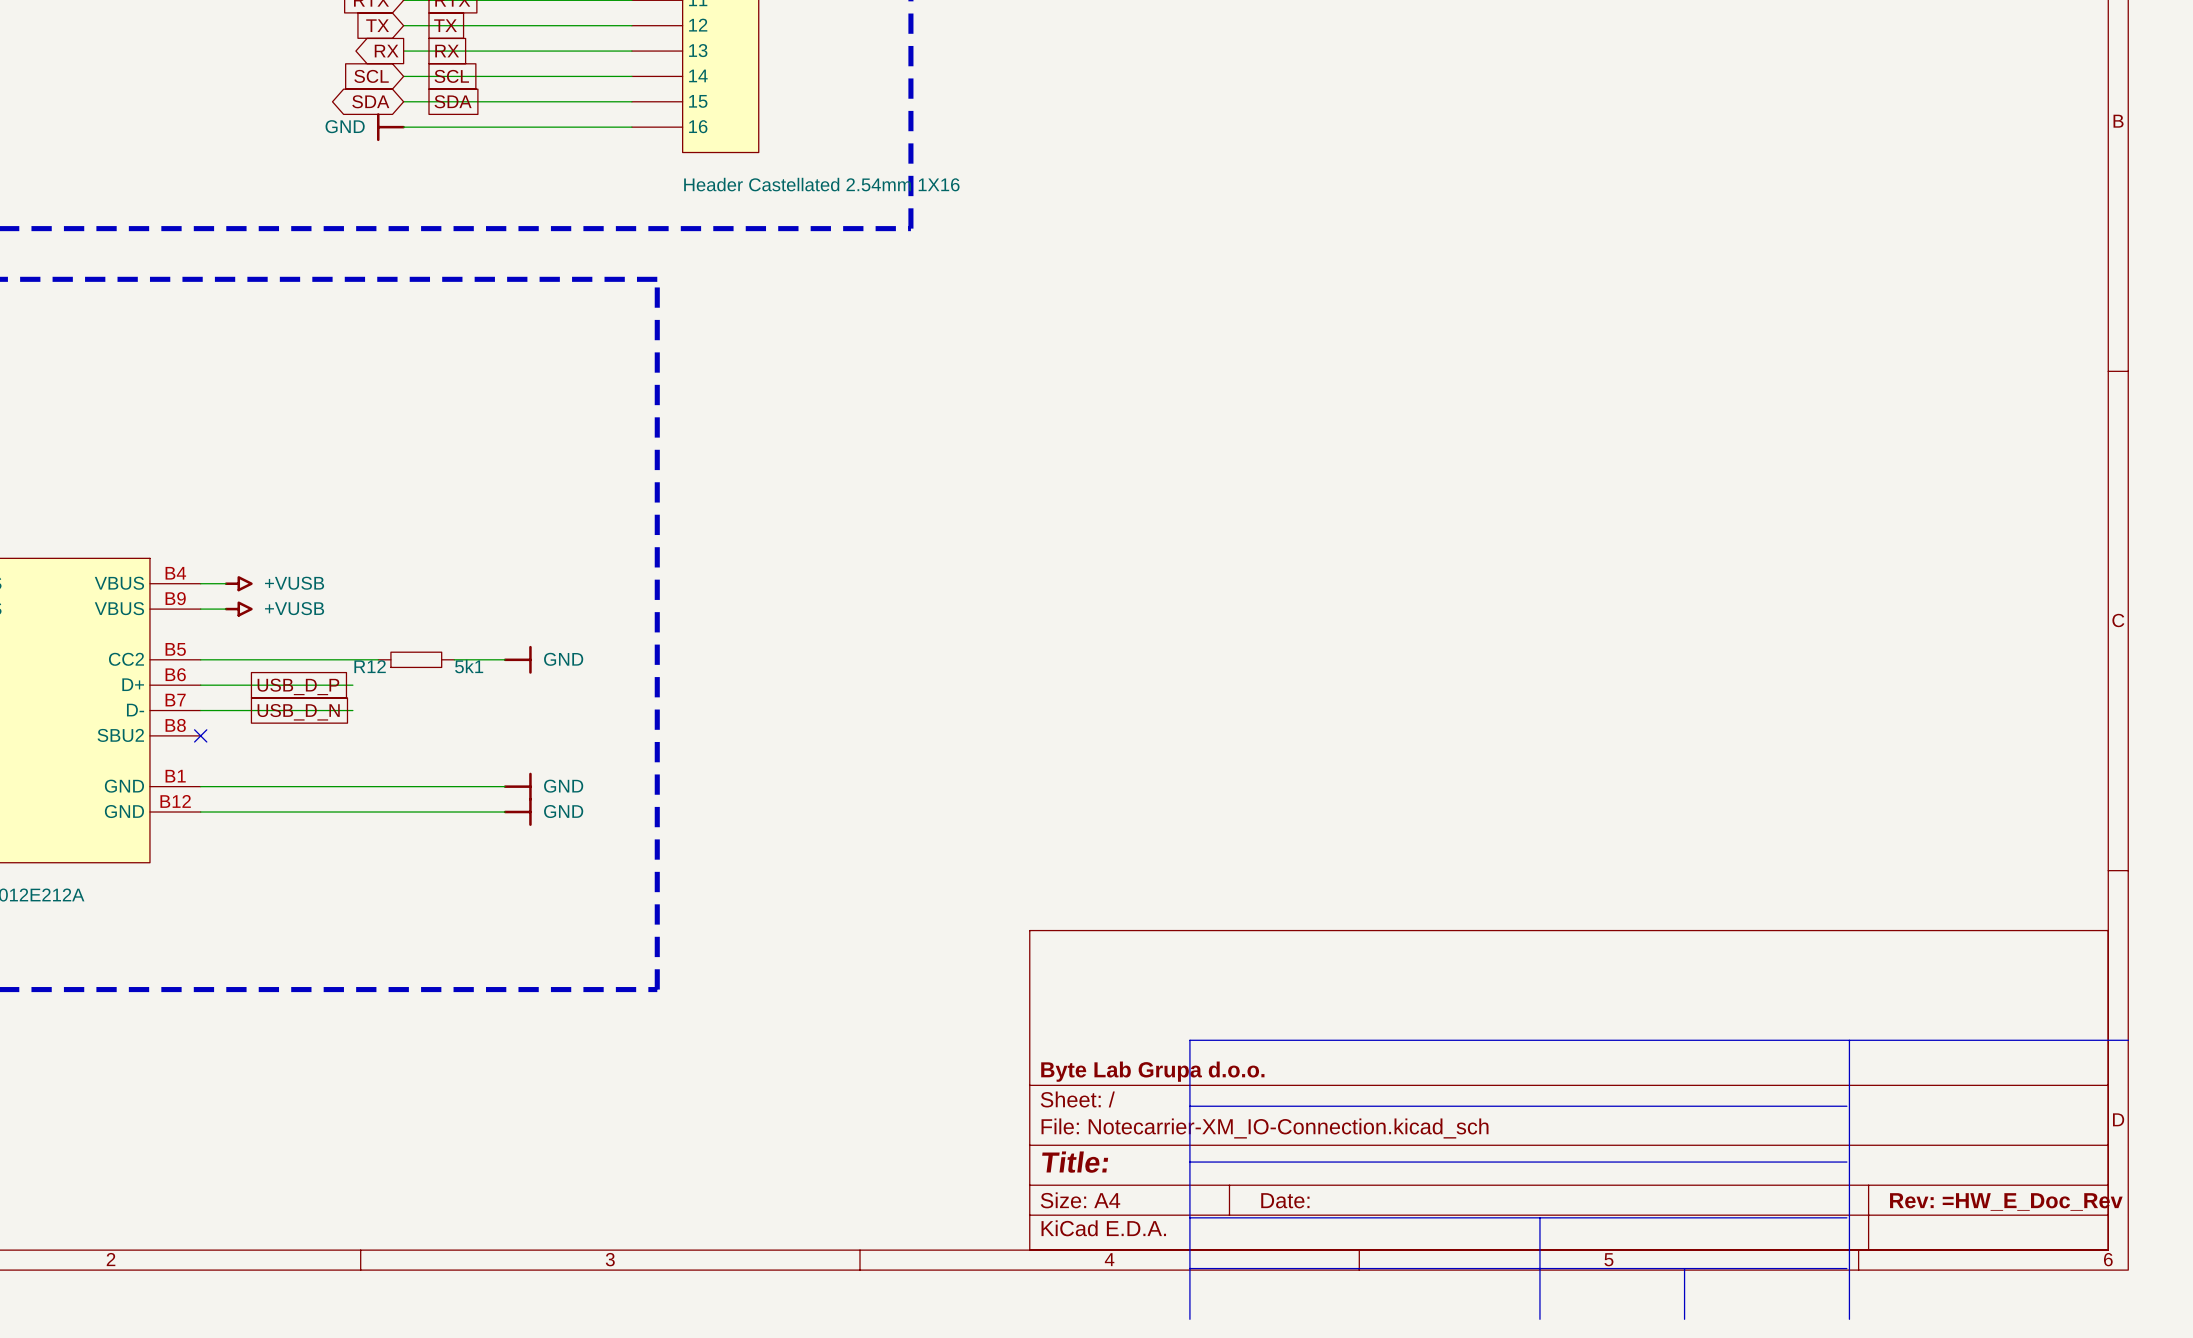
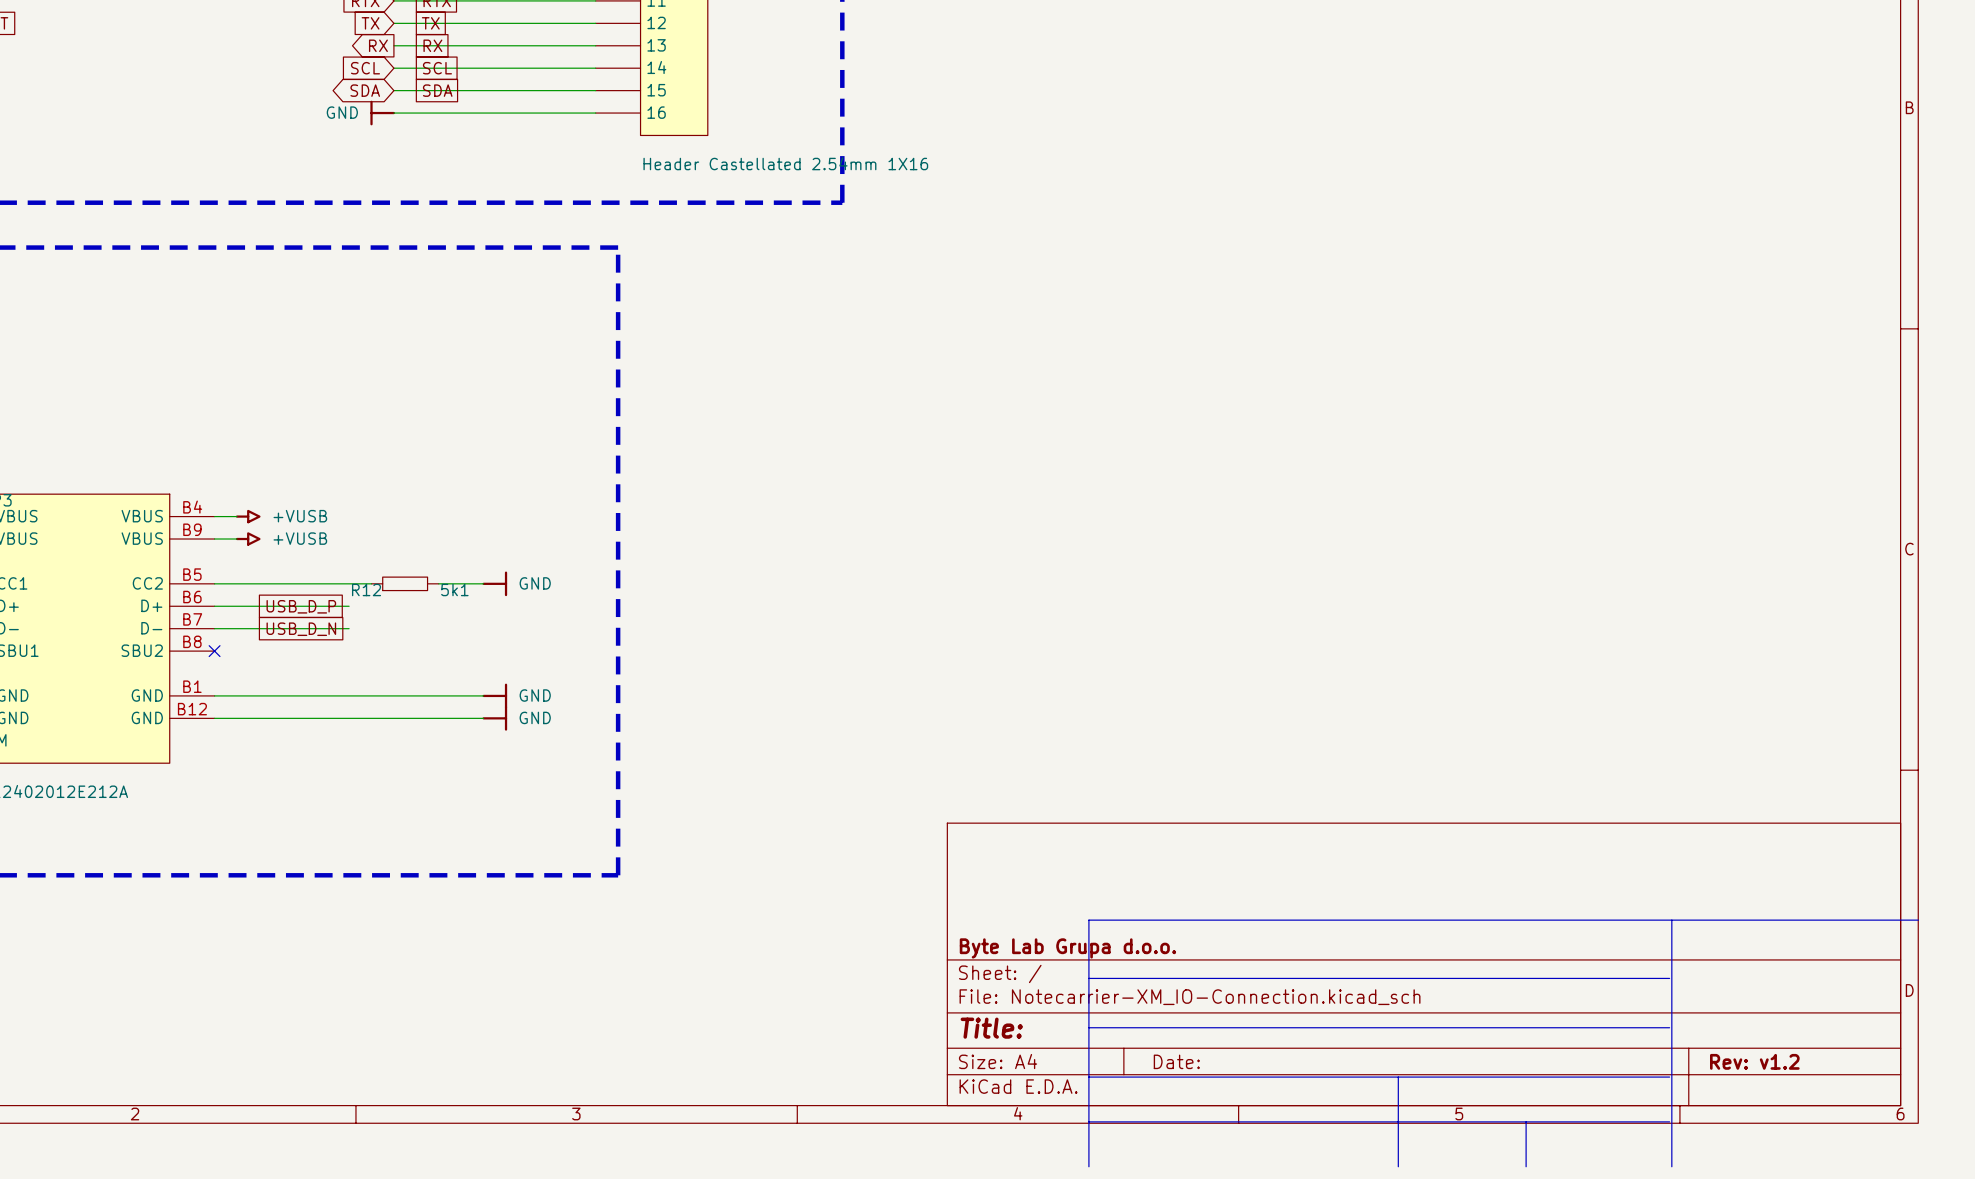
title block: Rev: =HW_E_Doc_Rev (2006, 1201) -> Rev: v1.2 (1754, 1061)

